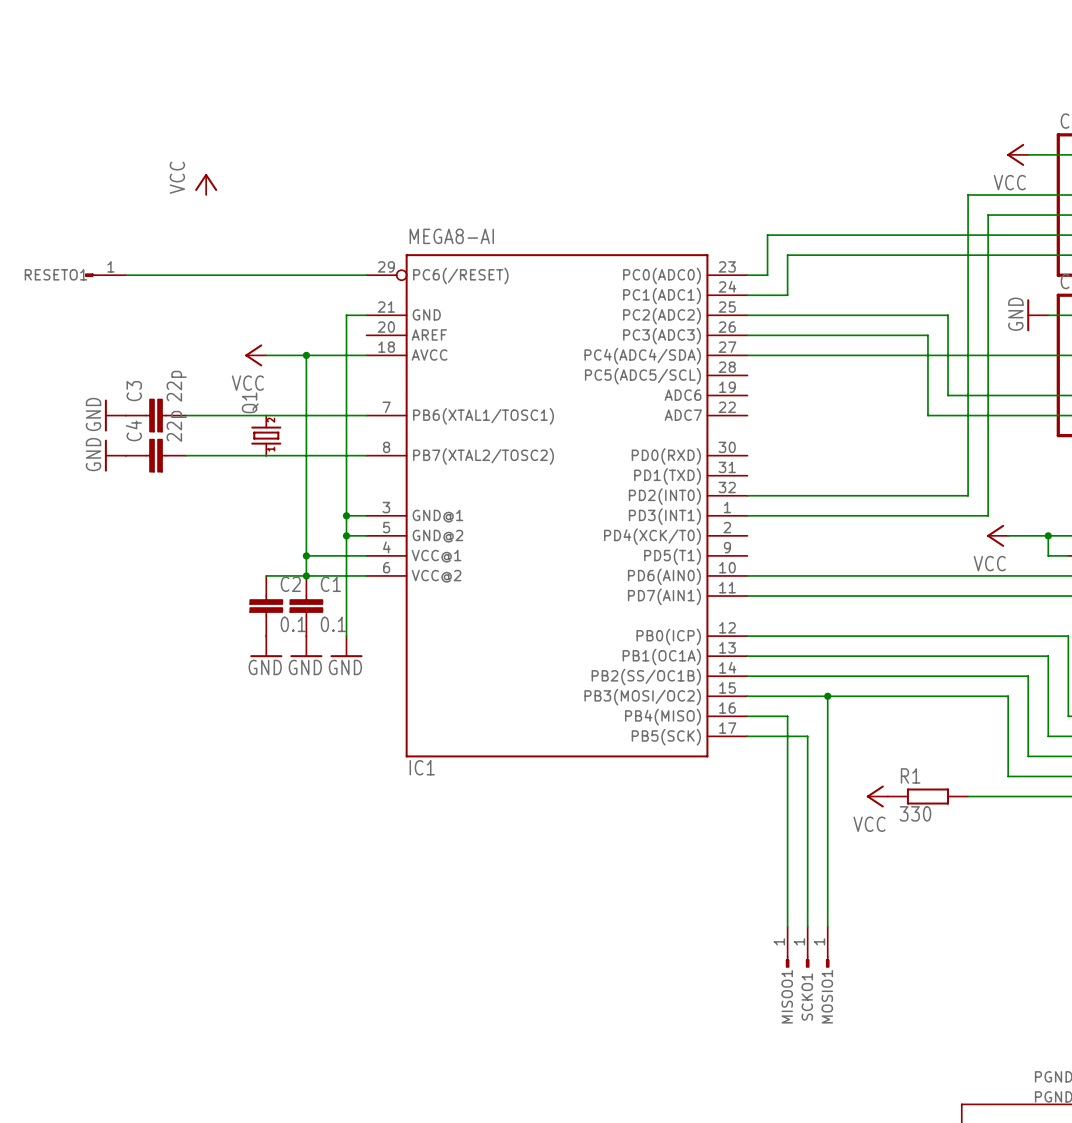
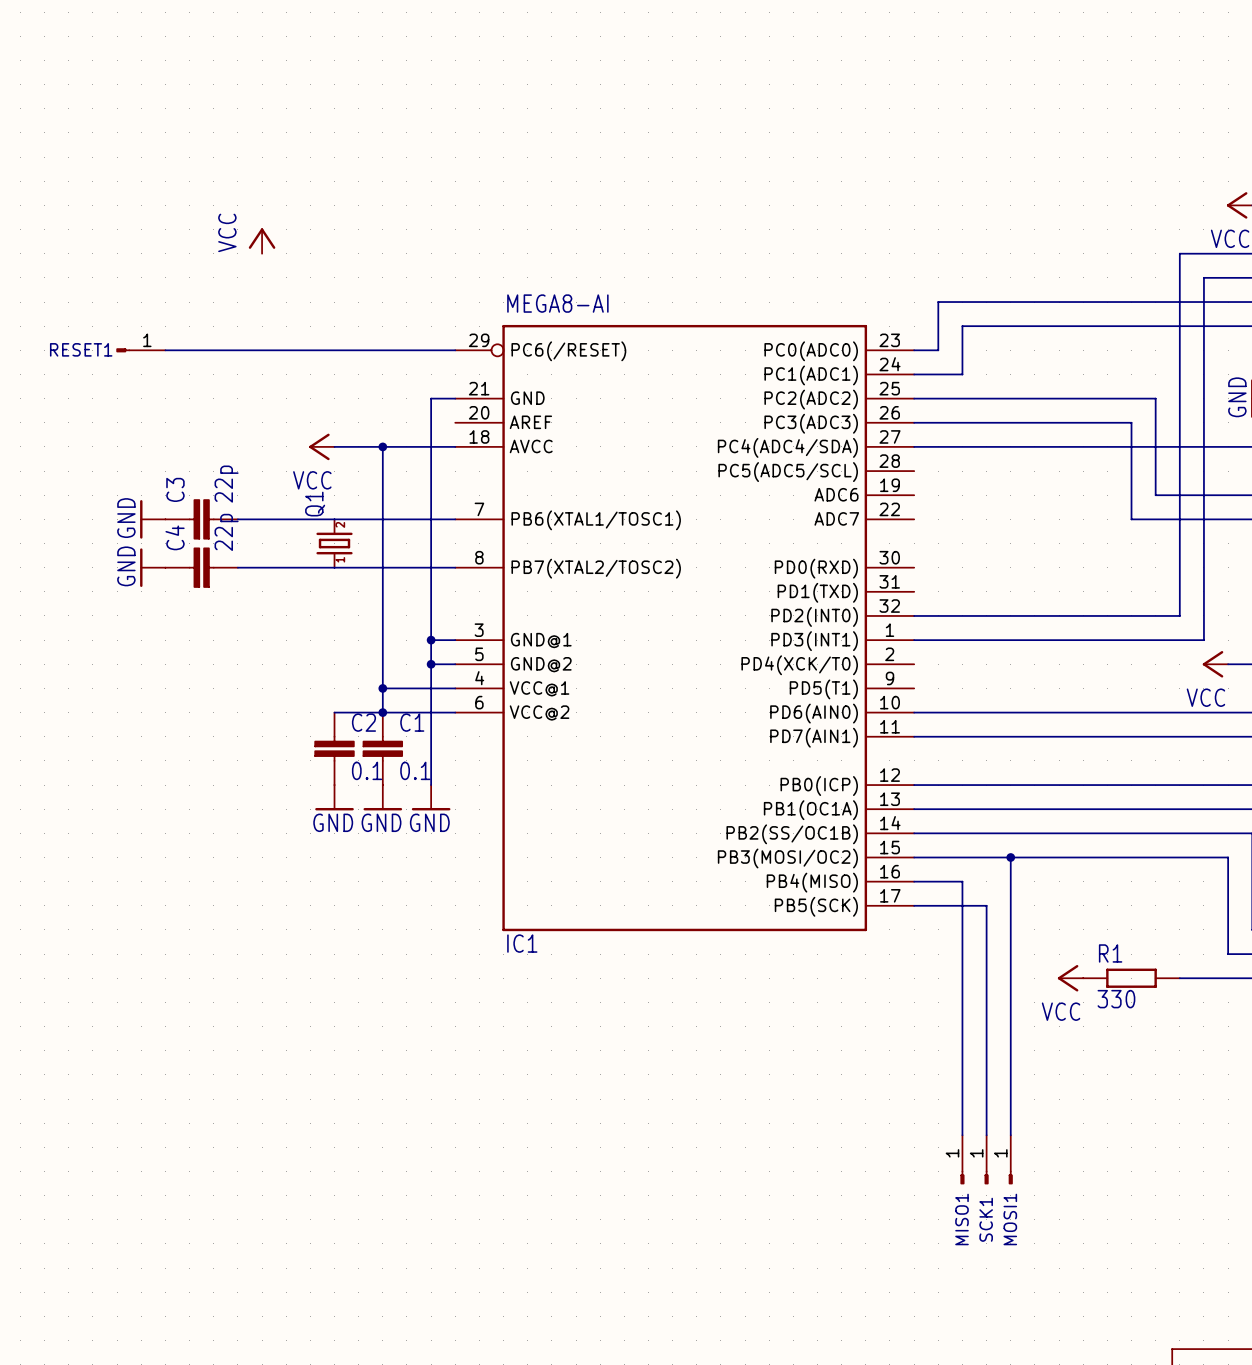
RESETO1 name: RESETO1 (56, 274) -> RESET1 (81, 349)
MISOO1 name: MISOO1 (787, 996) -> MISO1 (962, 1219)
MOSIO1 name: MOSIO1 (827, 996) -> MOSI1 (1010, 1219)
SCKO1 name: SCKO1 (807, 997) -> SCK1 (986, 1219)

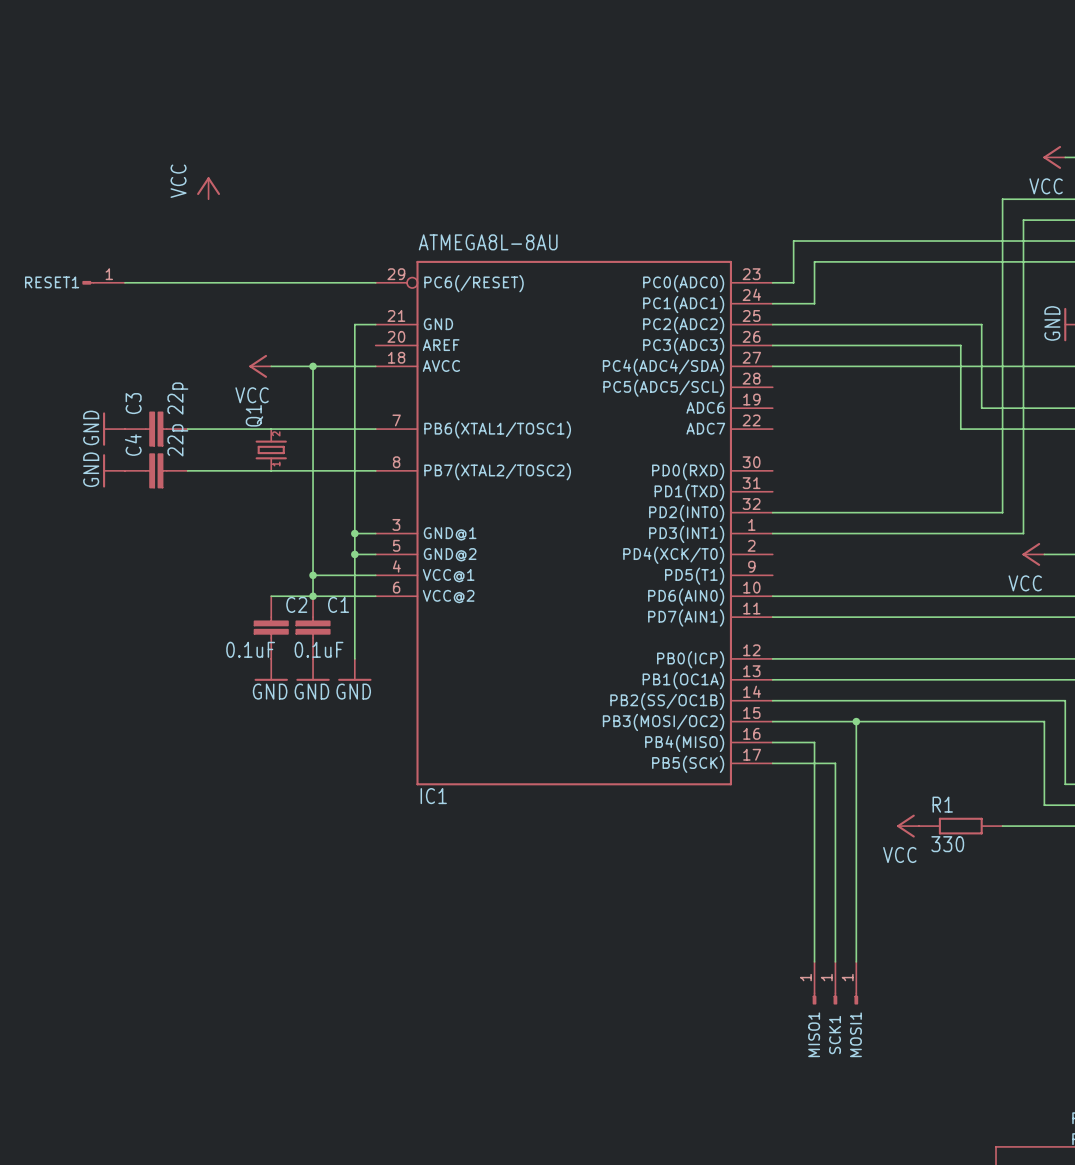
IC1 value: MEGA8-AI (557, 303) -> ATMEGA8L-8AU (488, 242)
C2 value: 0.1 (367, 770) -> 0.1uF (250, 649)
C1 value: 0.1 (415, 770) -> 0.1uF (319, 649)

